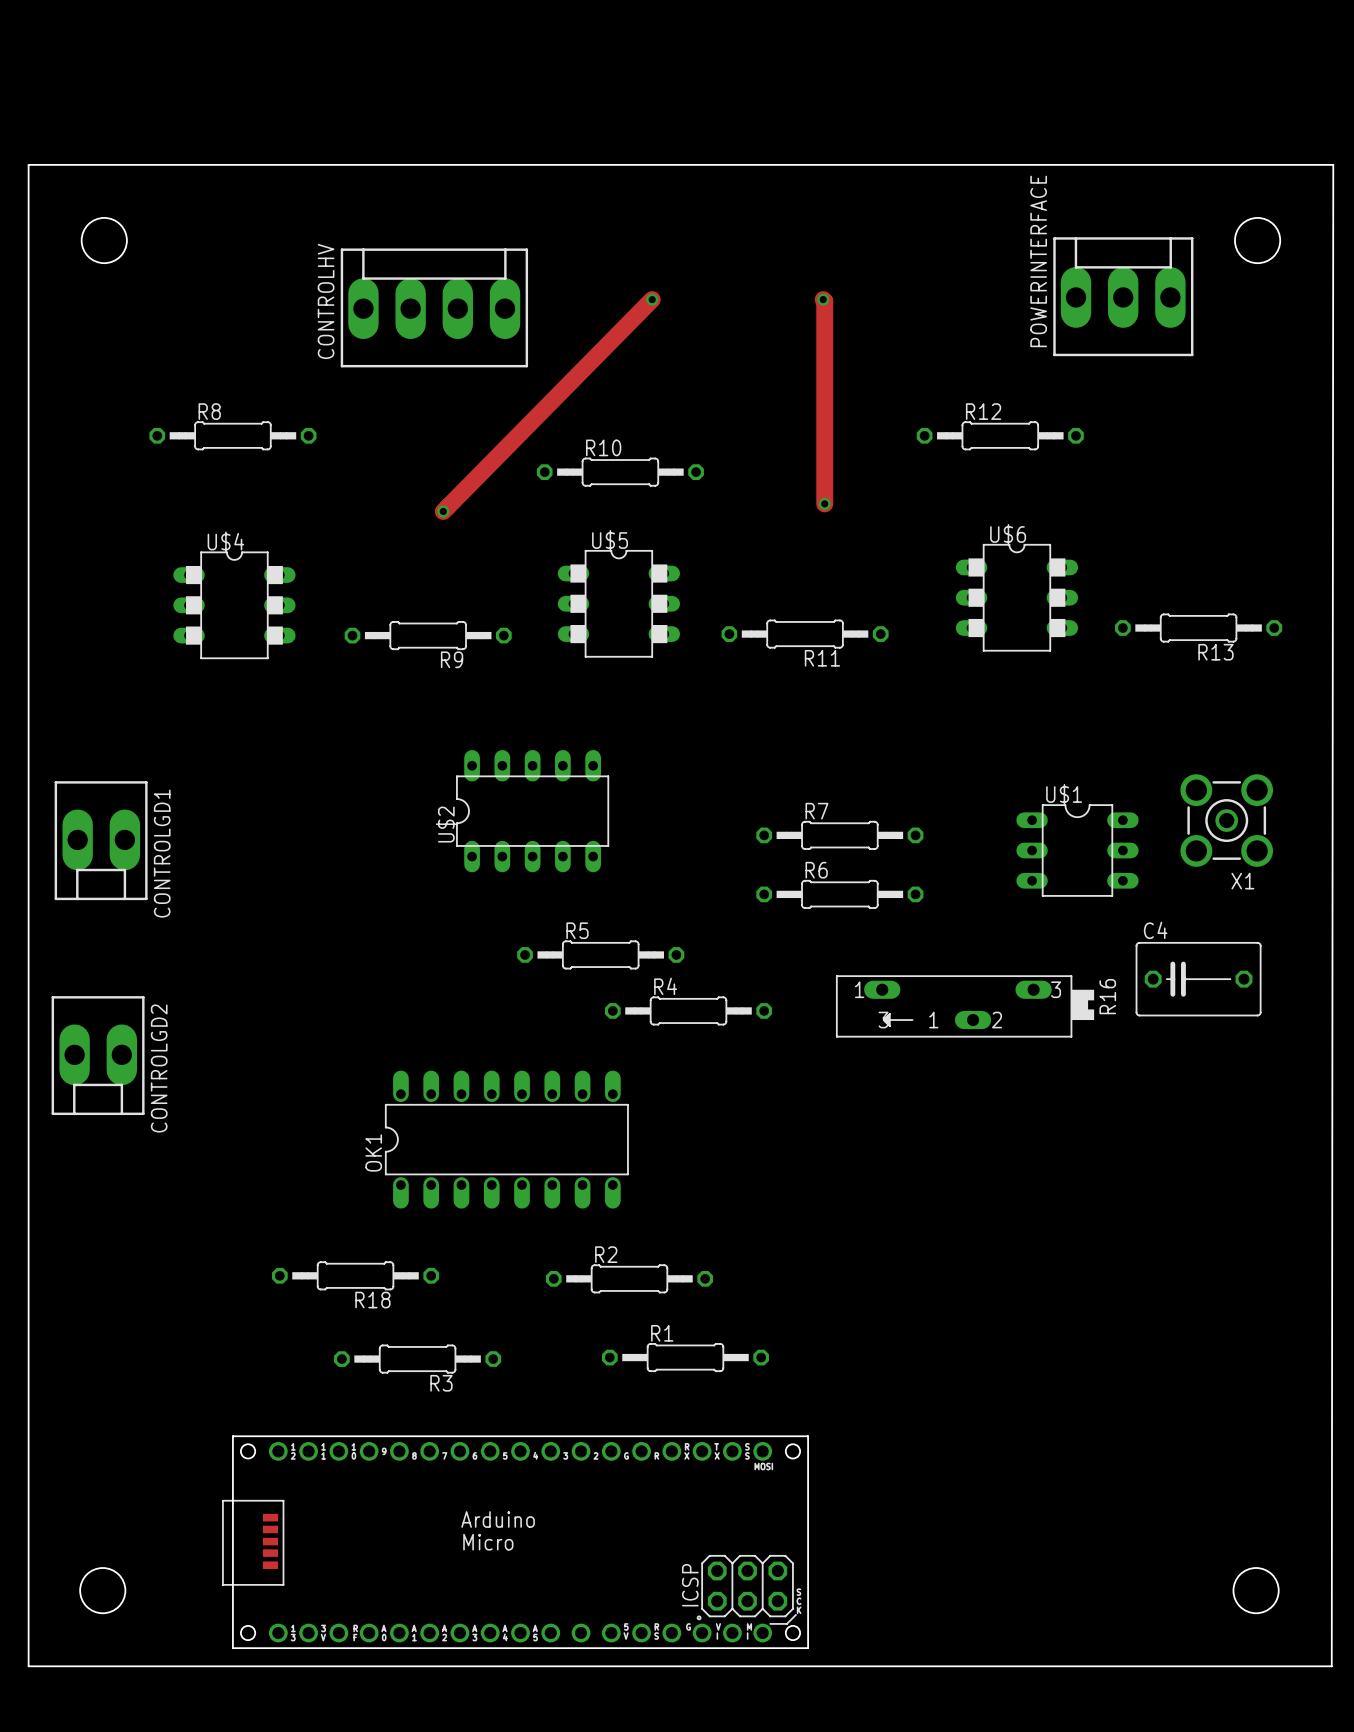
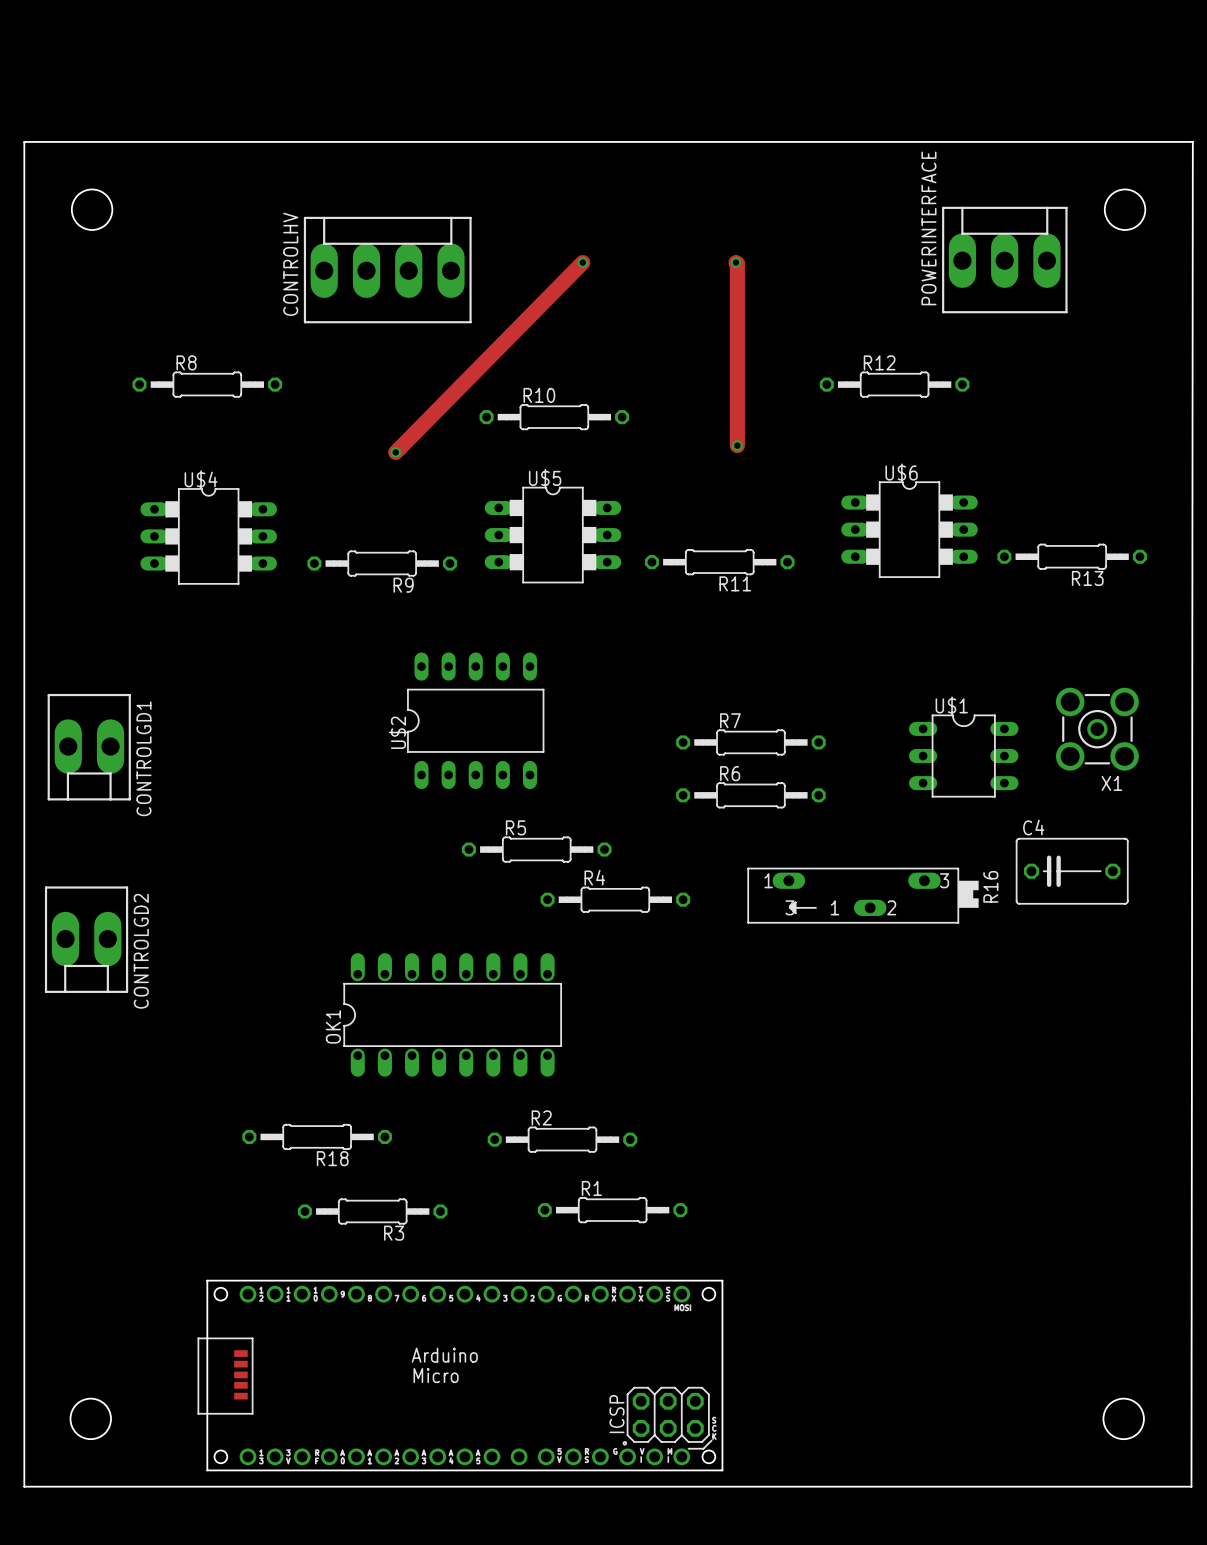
U$6 footprint: [955, 543, 1079, 652] -> [841, 481, 978, 578]
U$5 footprint: [557, 549, 681, 658] -> [484, 486, 622, 584]
U$4 footprint: [173, 551, 296, 660] -> [140, 488, 278, 585]
U$2 footprint: [456, 750, 610, 873] -> [407, 652, 545, 790]

